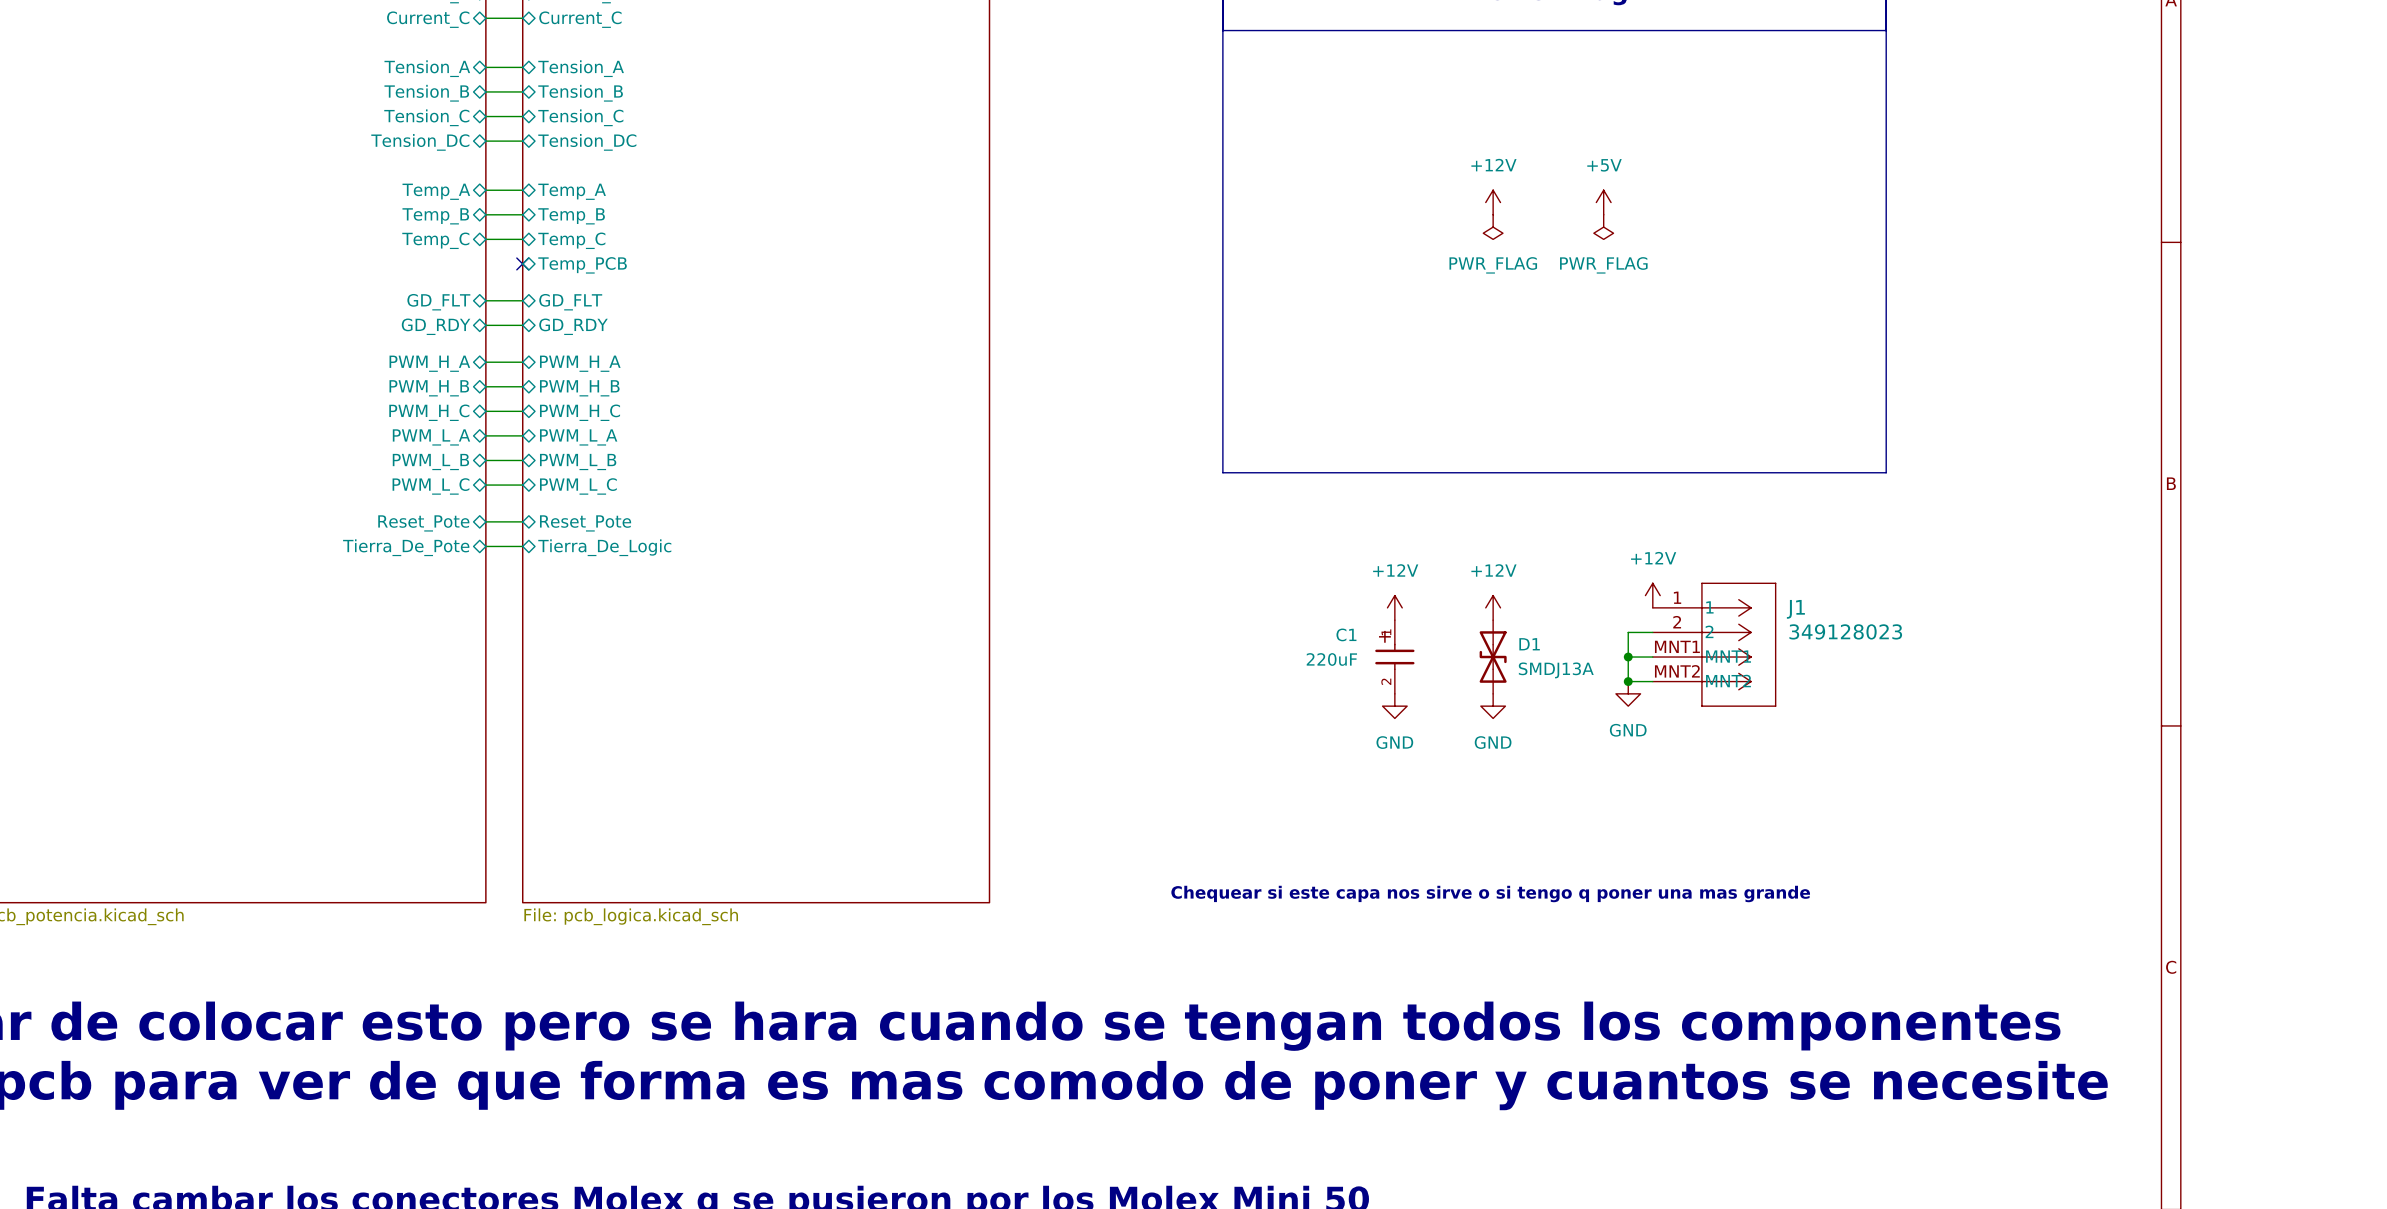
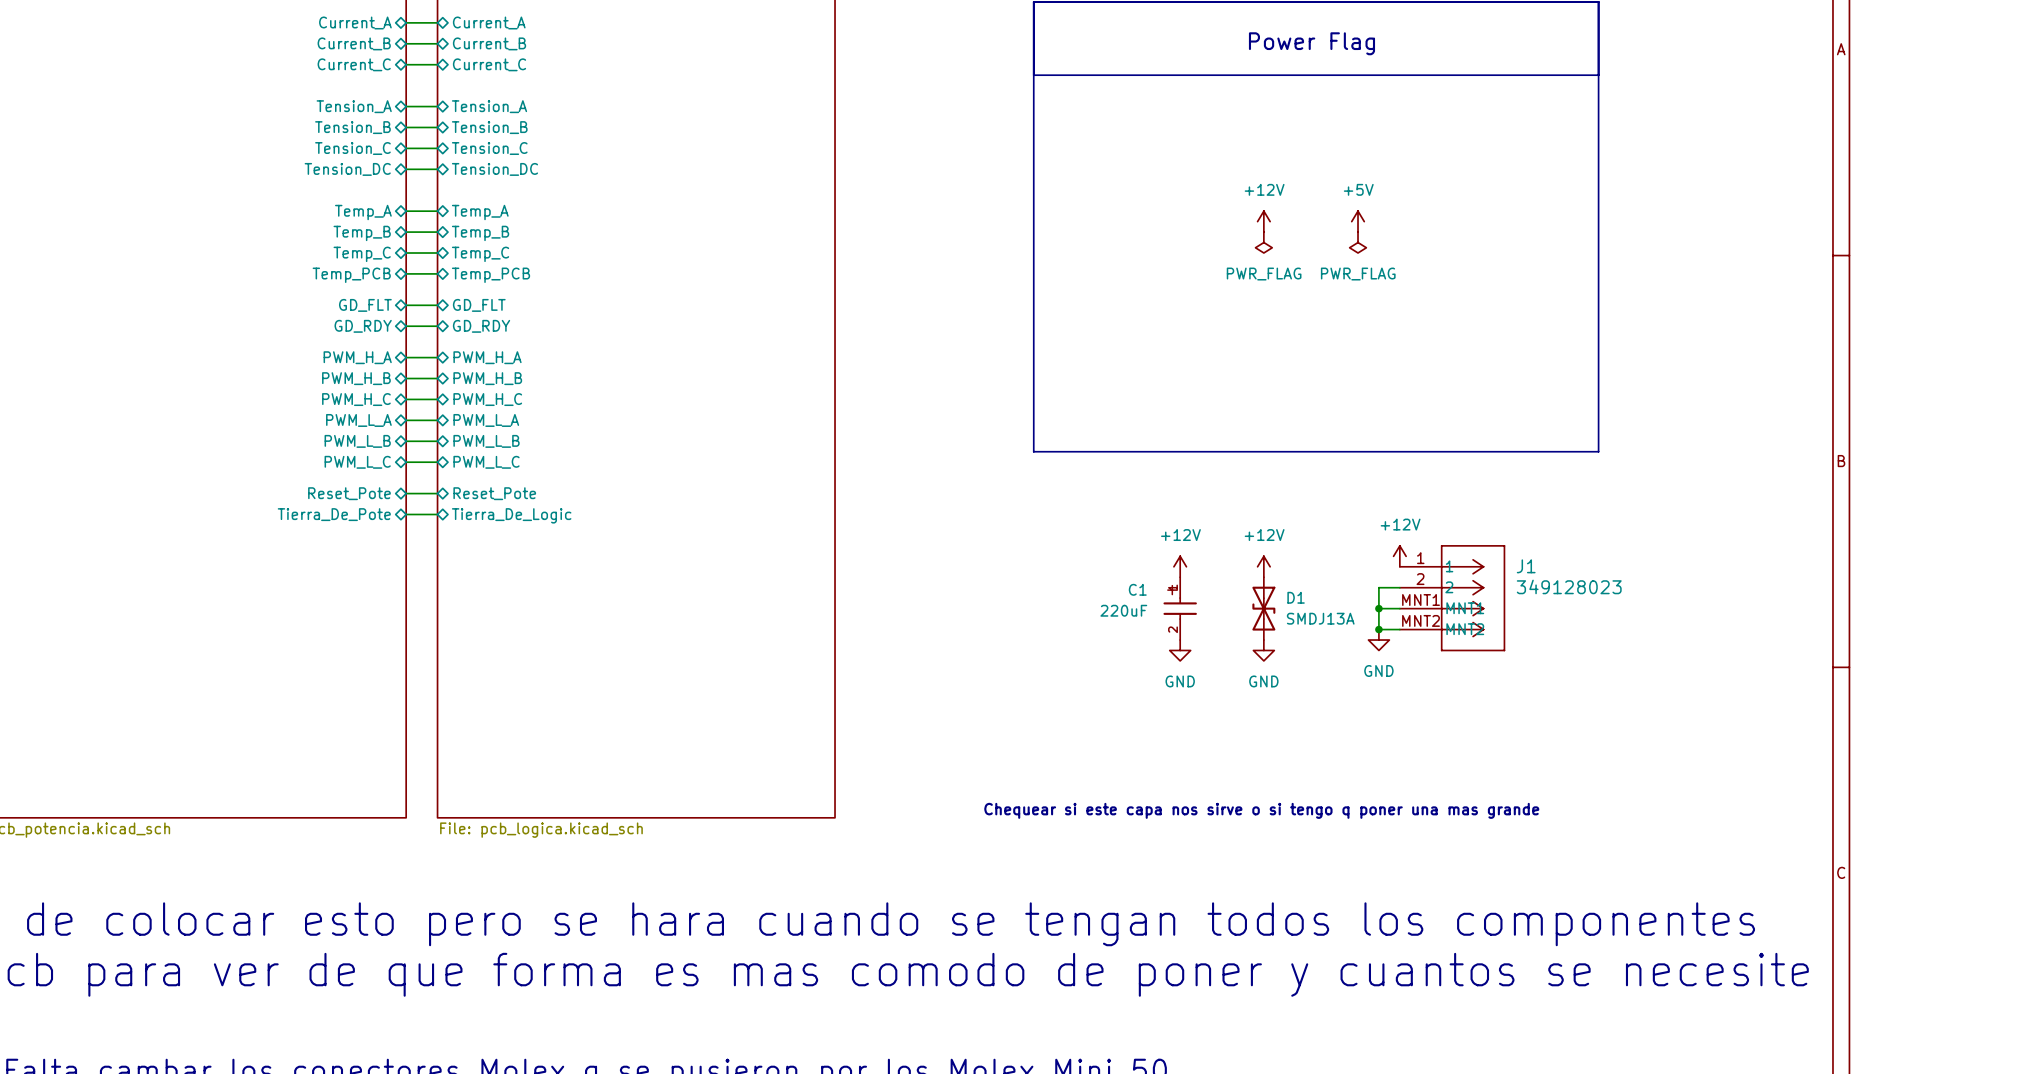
wire: none -> (406, 273) (437, 273)
no-connect mark: (522, 263) -> none
sheet pin: none -> Temp_PCB (351, 275)

